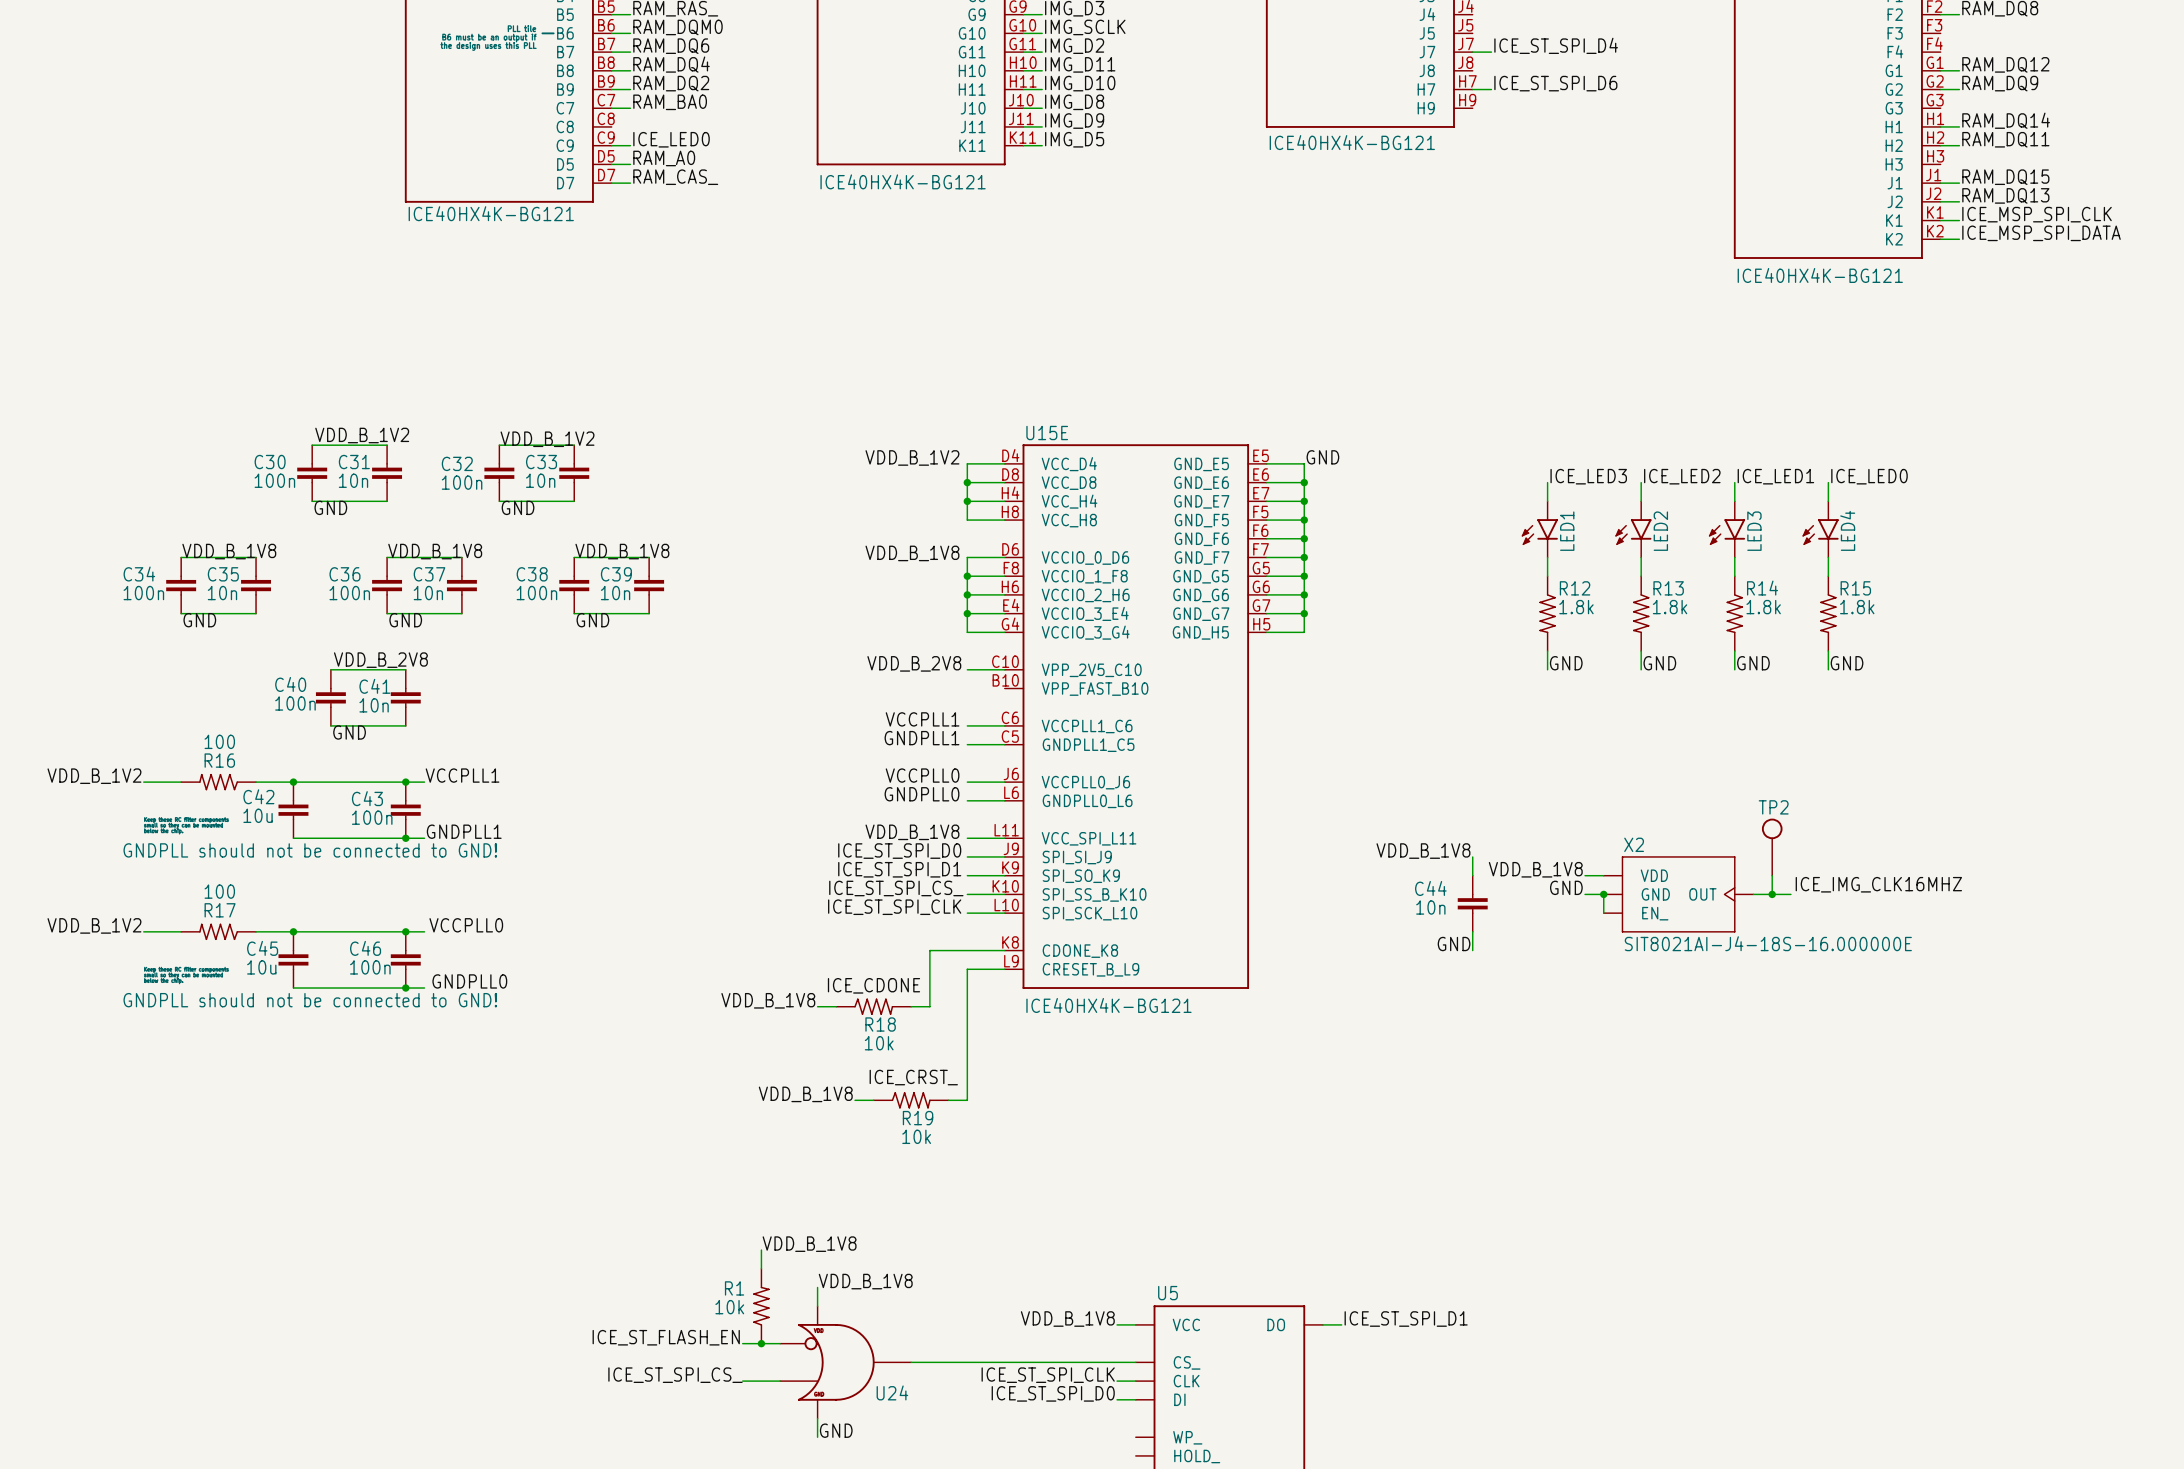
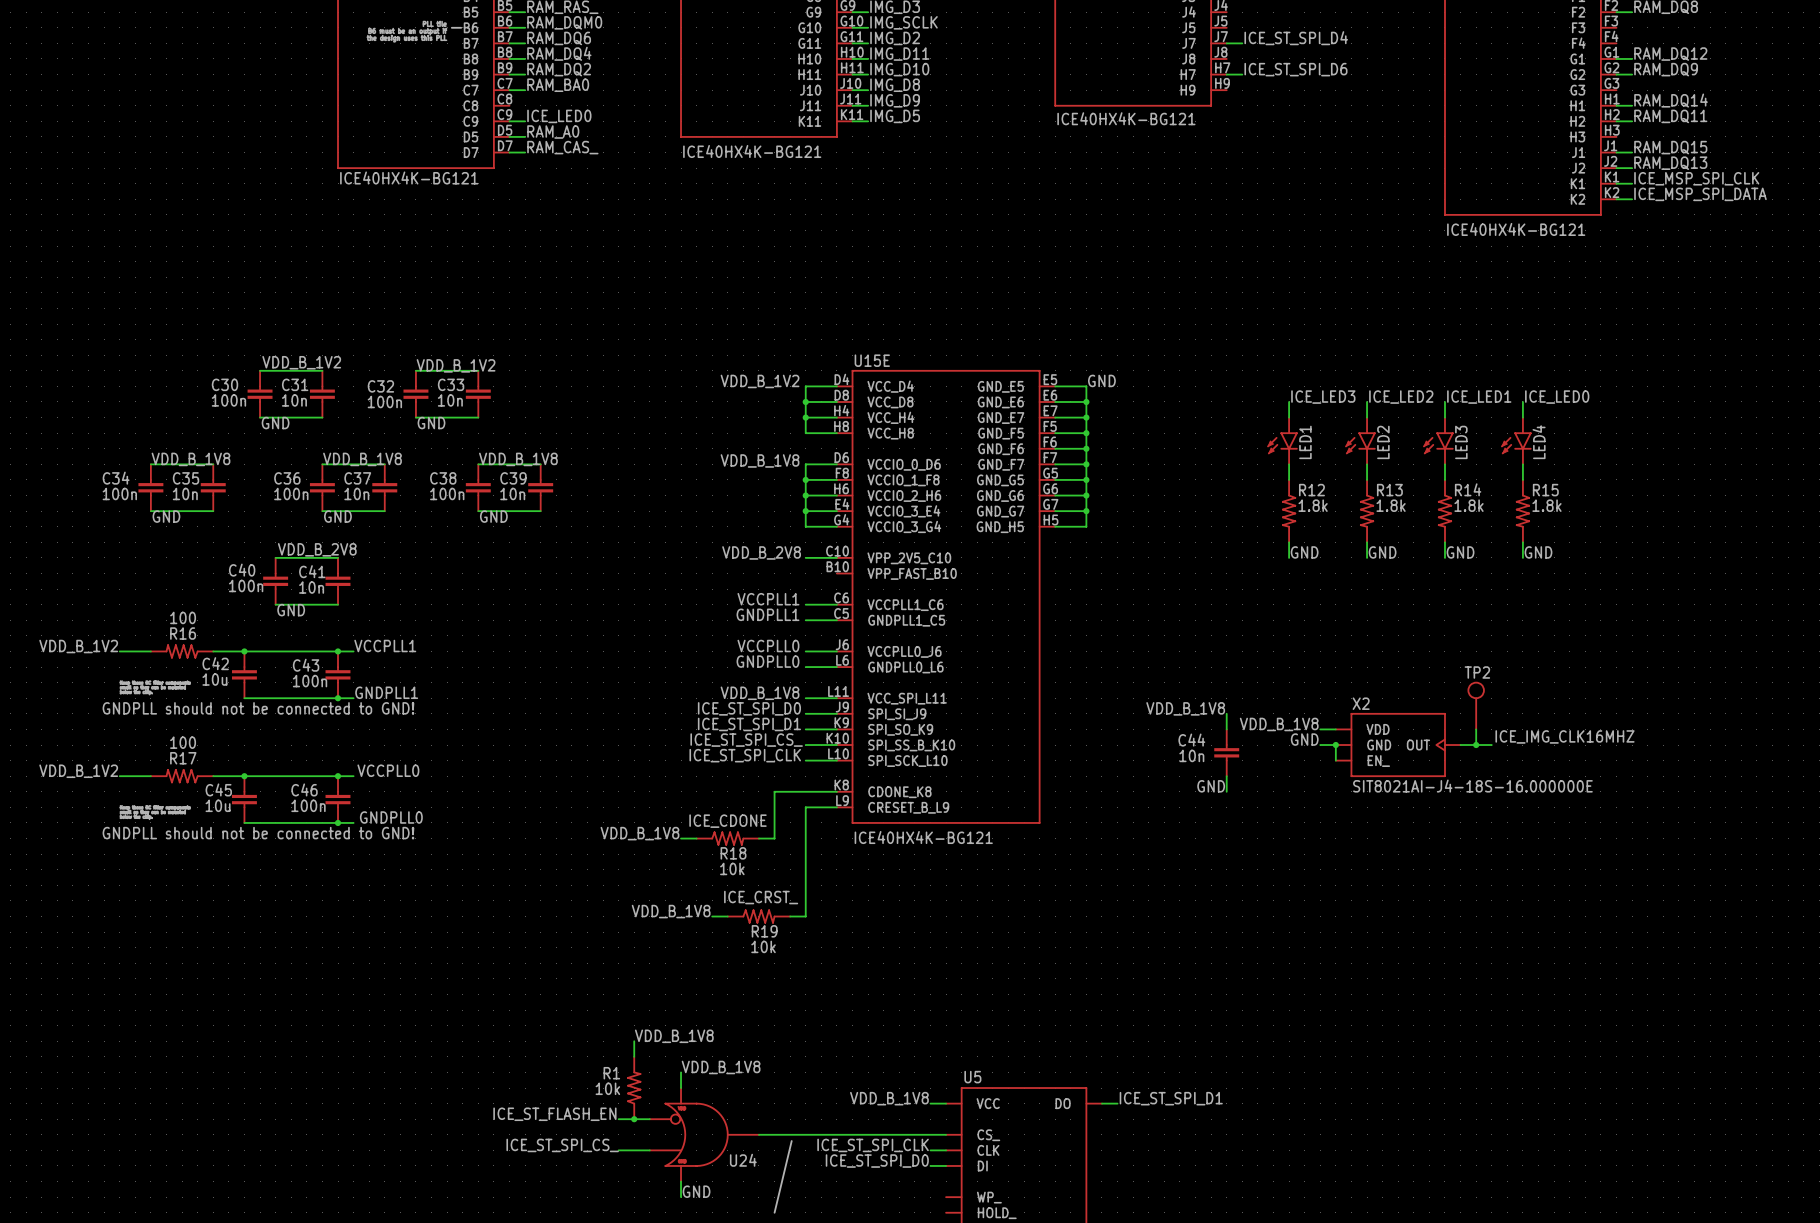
line: none -> (791, 1141) (774, 1212)

